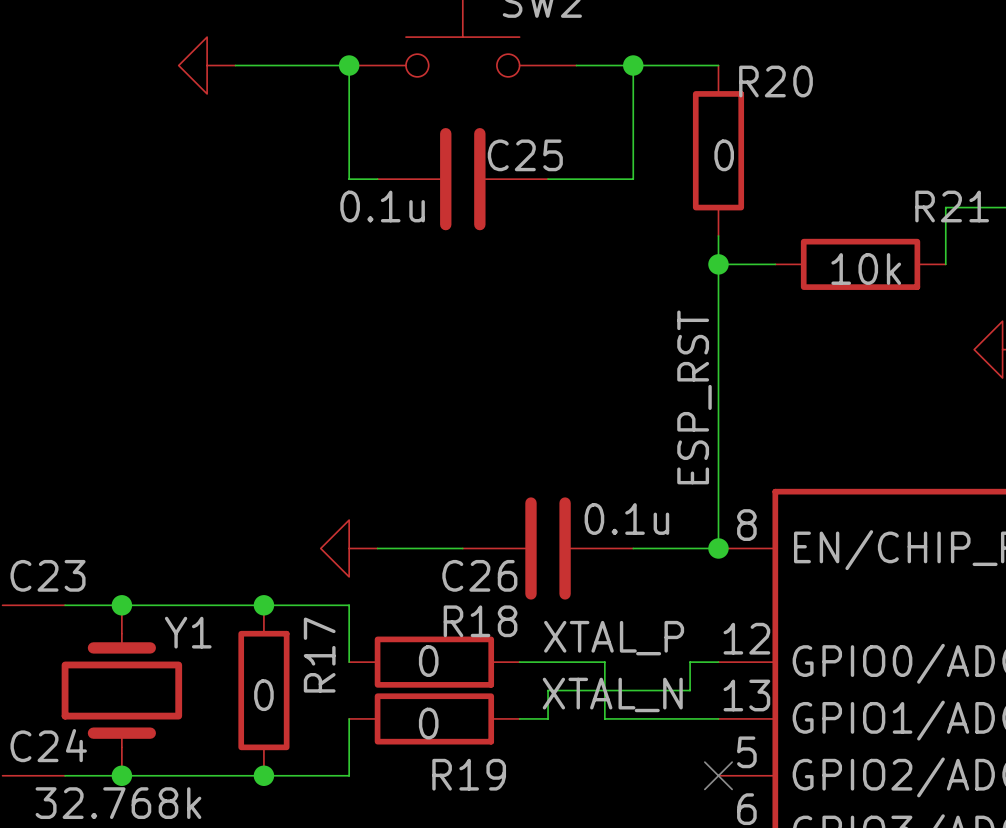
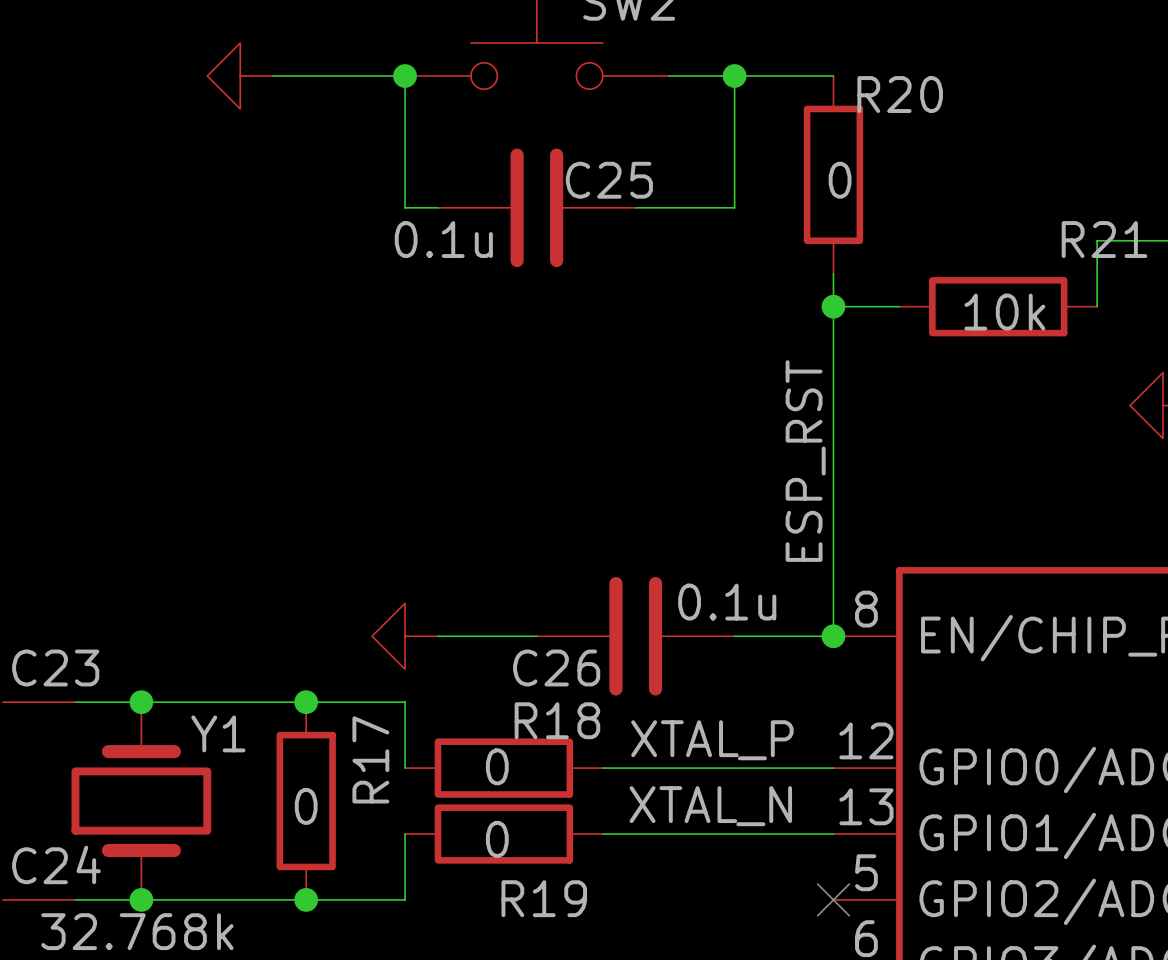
wire: (604, 662) (604, 718) -> (635, 834) (701, 834)
wire: (690, 662) (690, 690) (548, 690) (548, 718) -> (800, 768) (701, 768)

